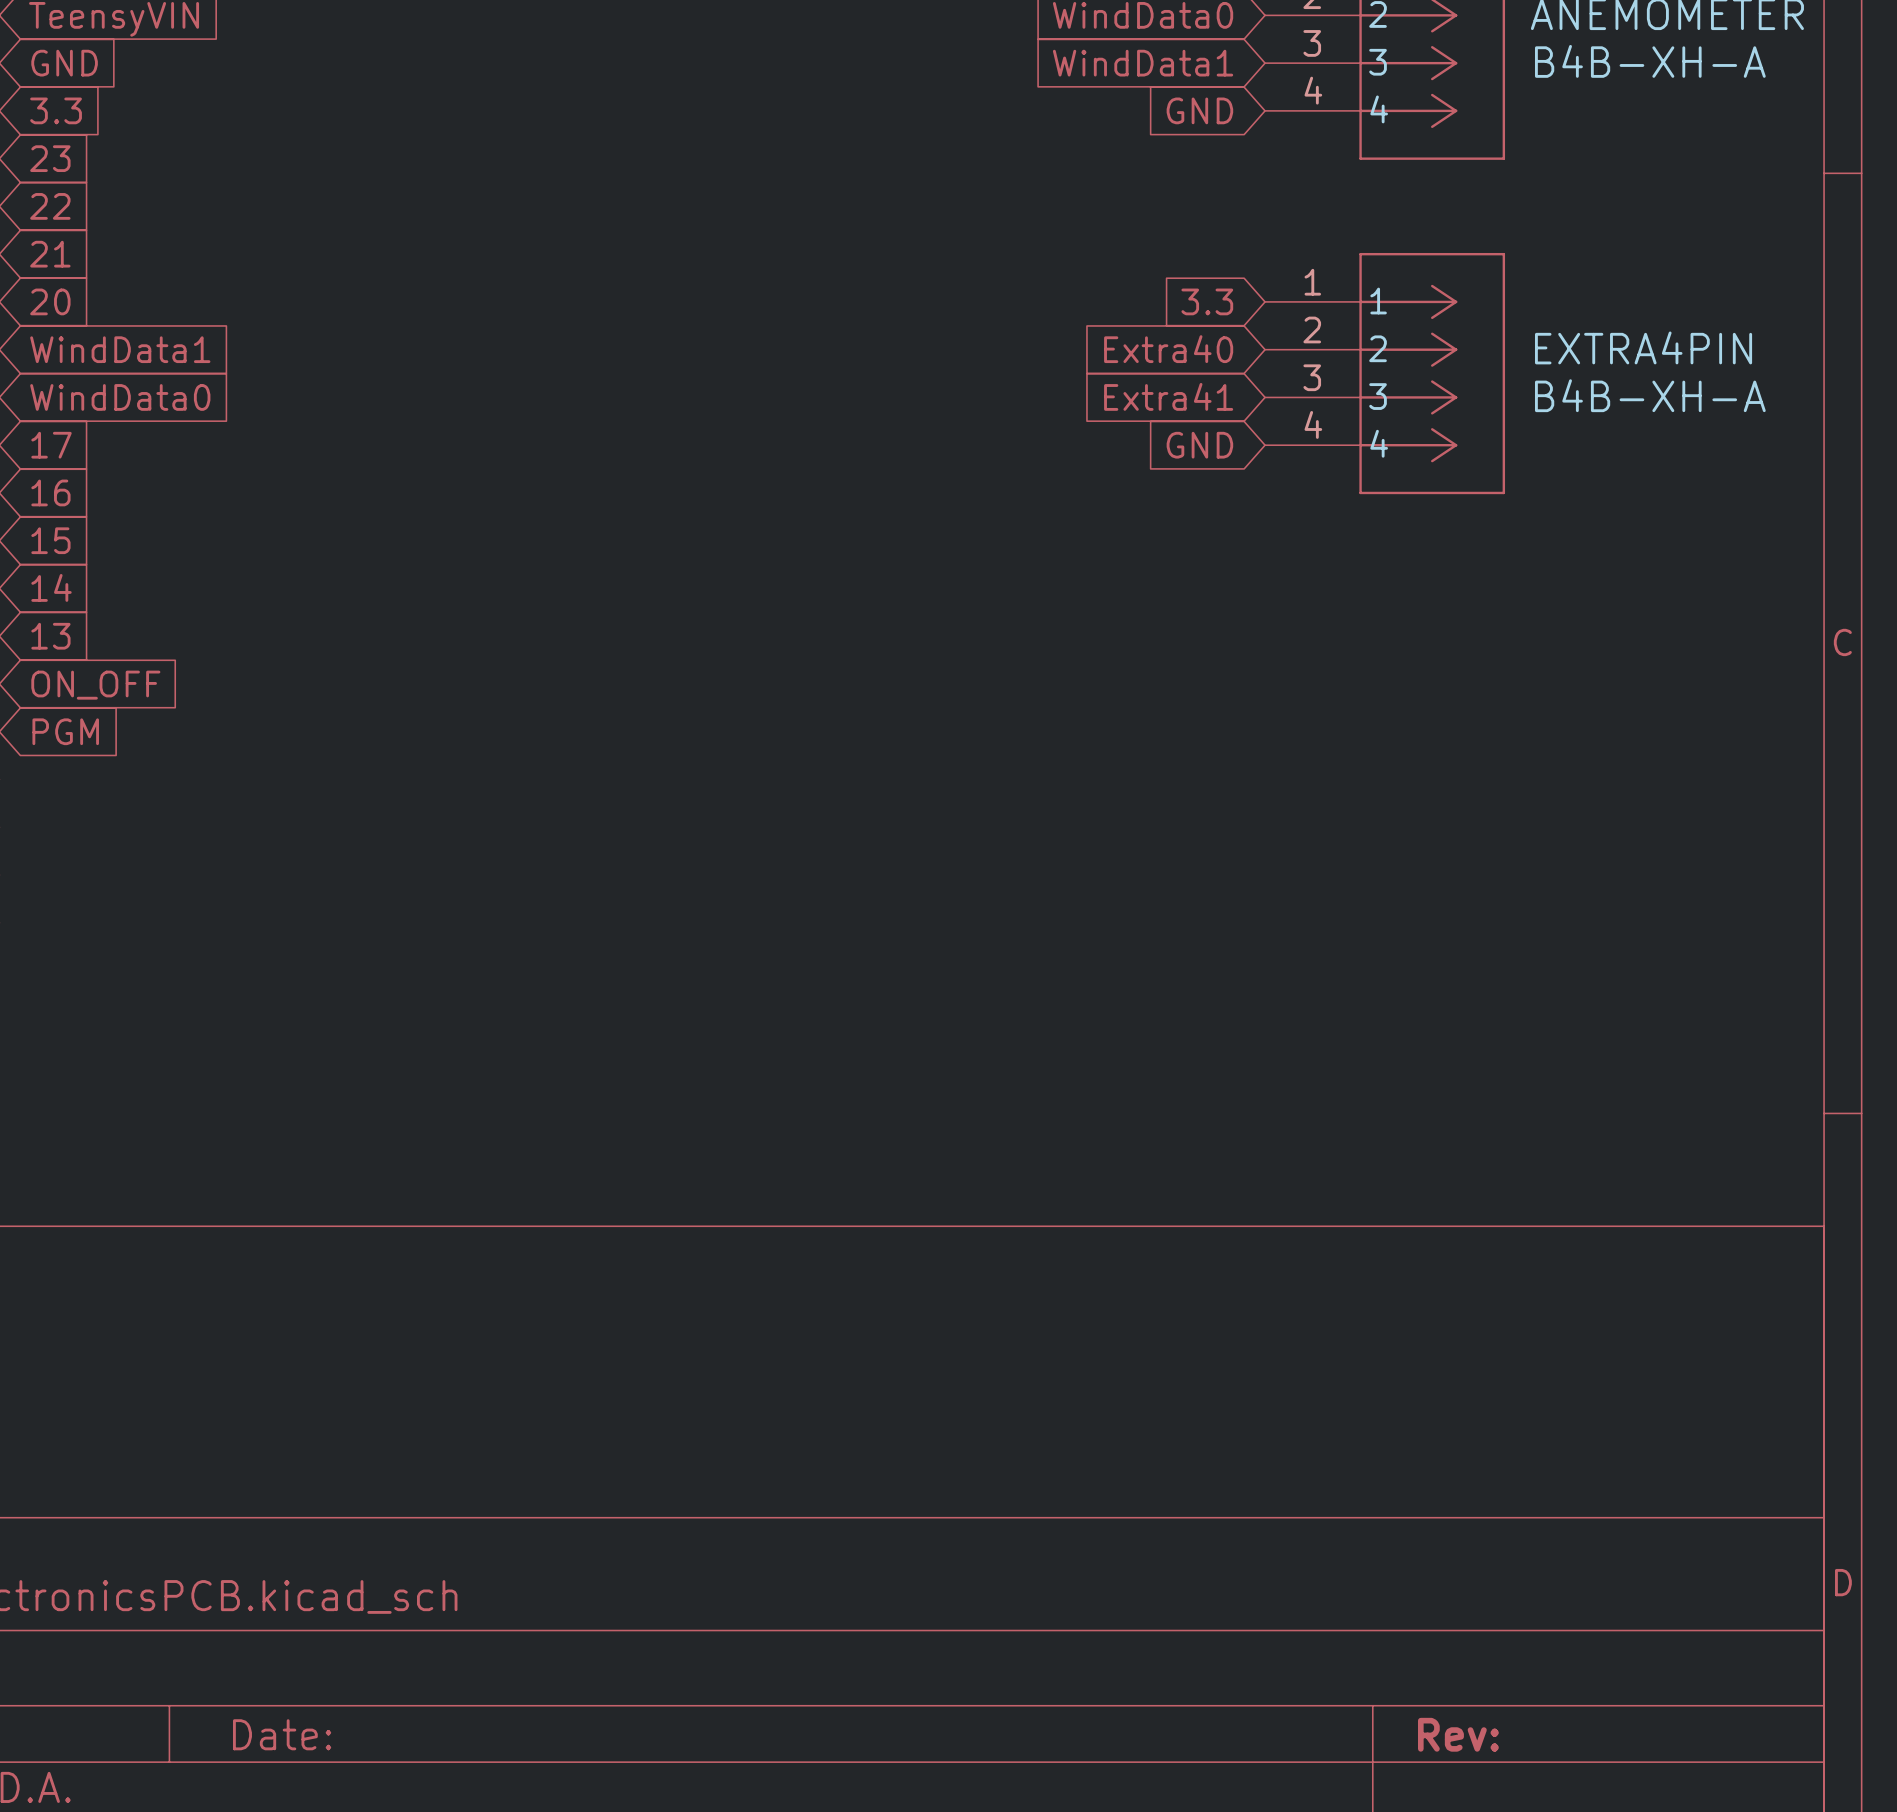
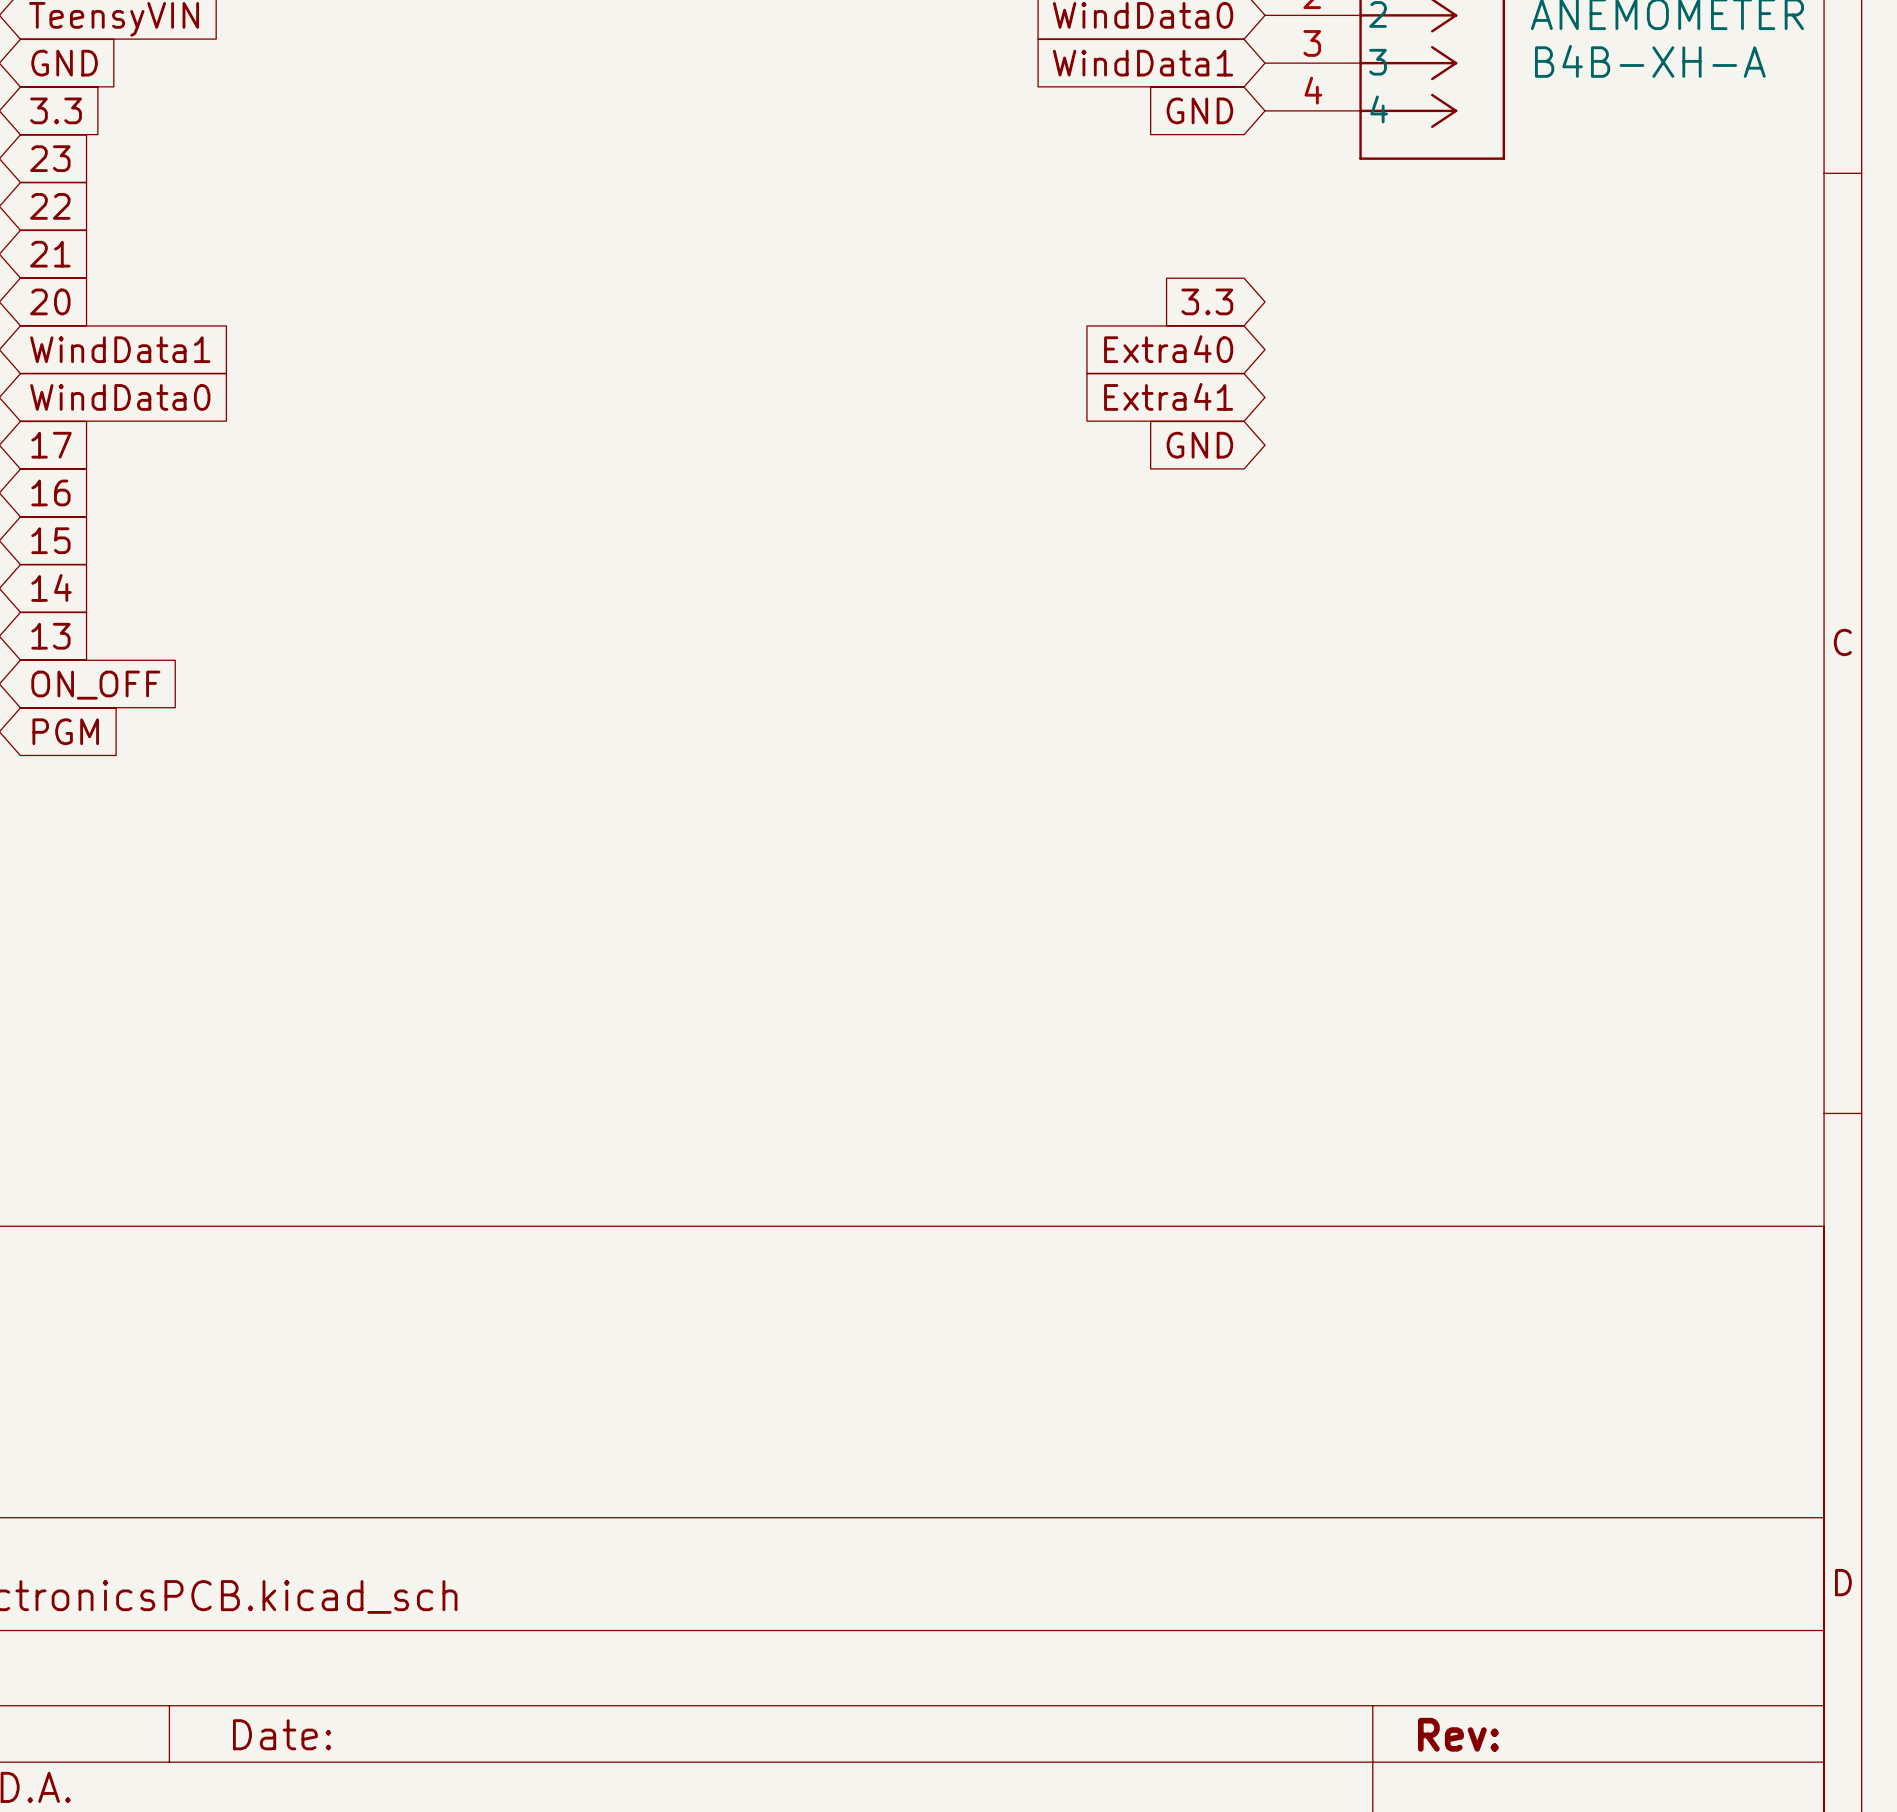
EXTRA4PIN: B4B-XH-A (1385, 373) -> none

